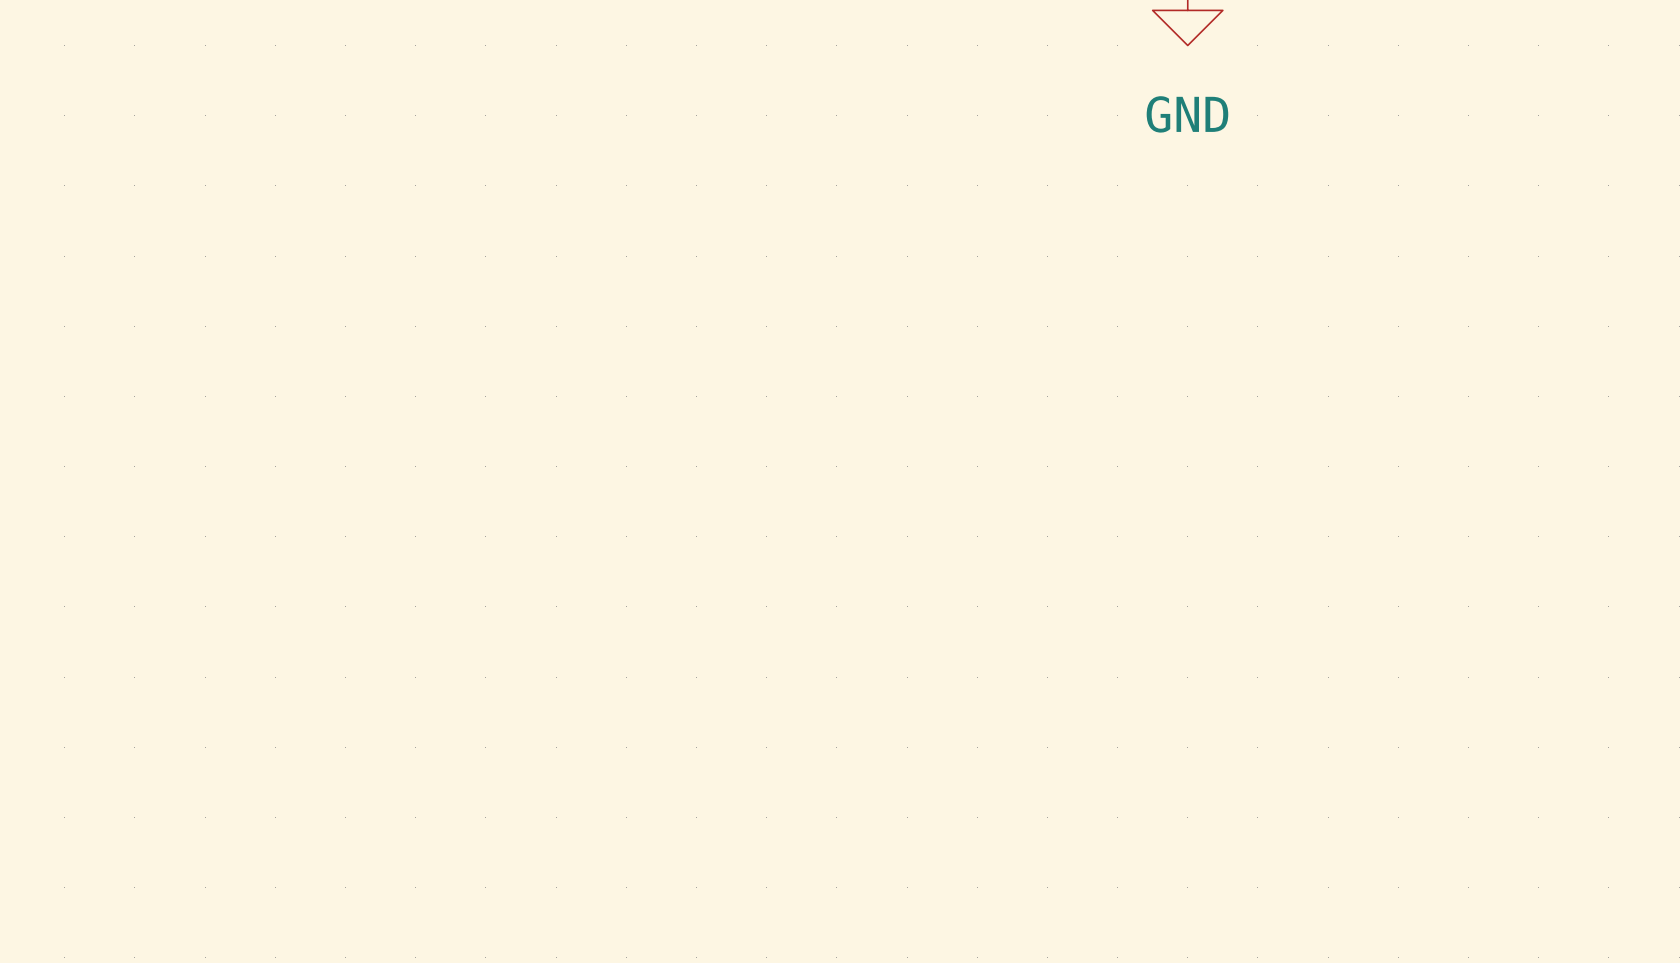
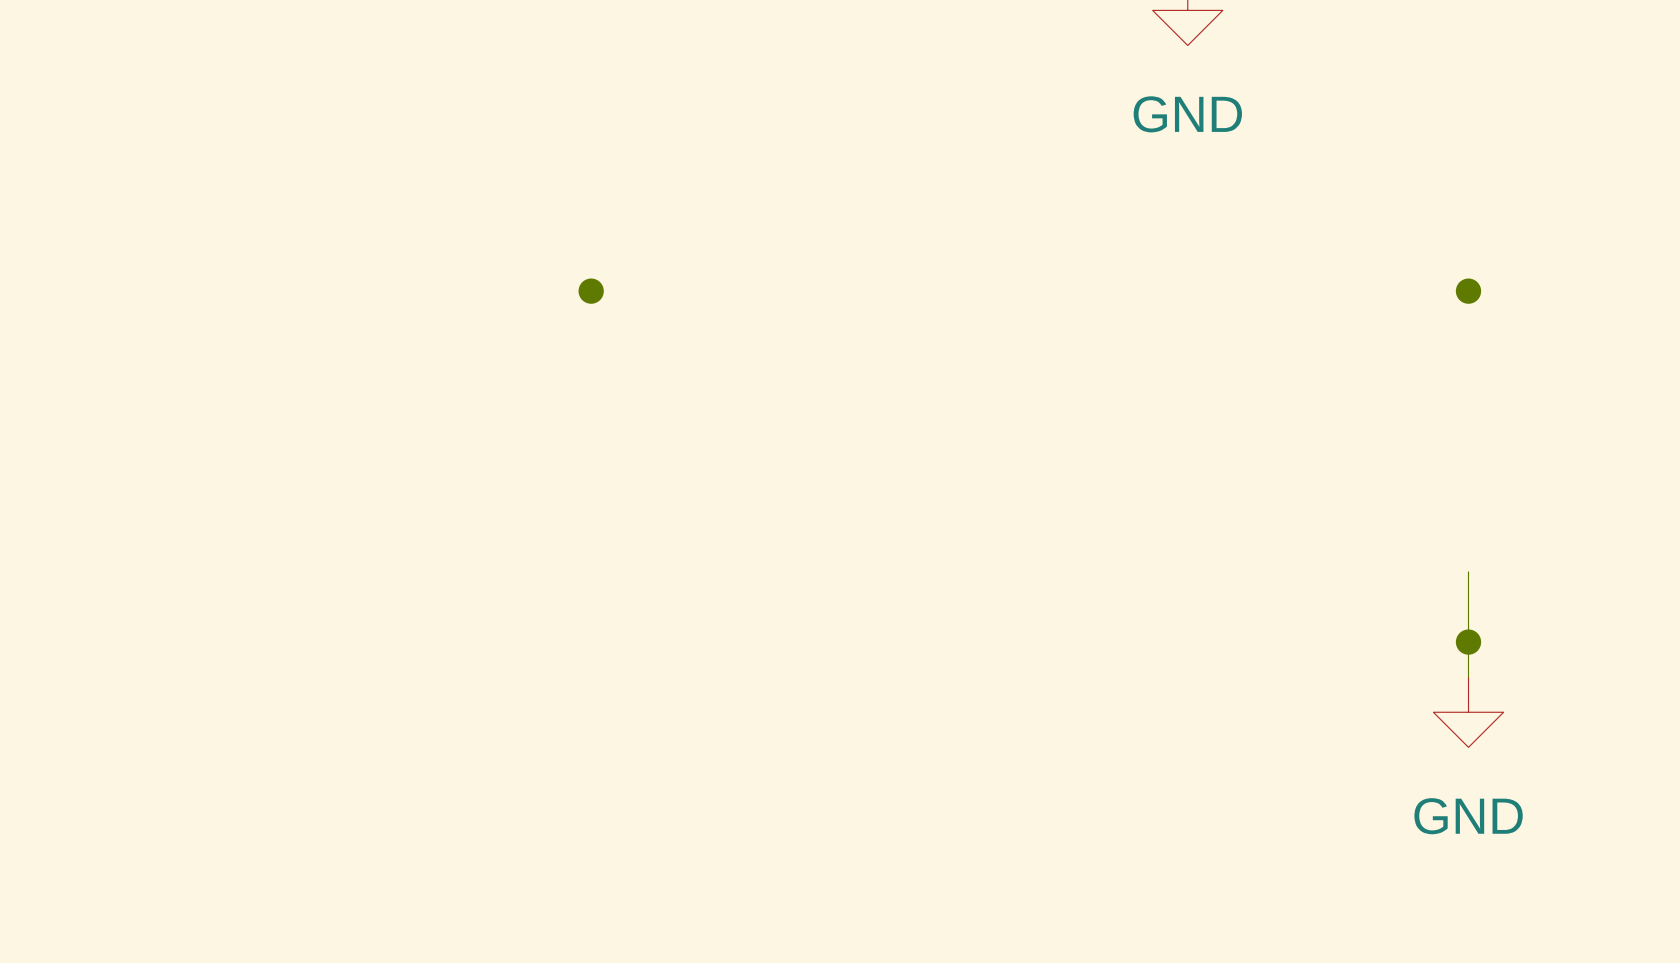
junction: none -> (591, 291)
junction: none -> (1468, 291)
wire: none -> (1468, 571) (1468, 677)
junction: none -> (1468, 642)
power symbol: none -> GND (1468, 712)

